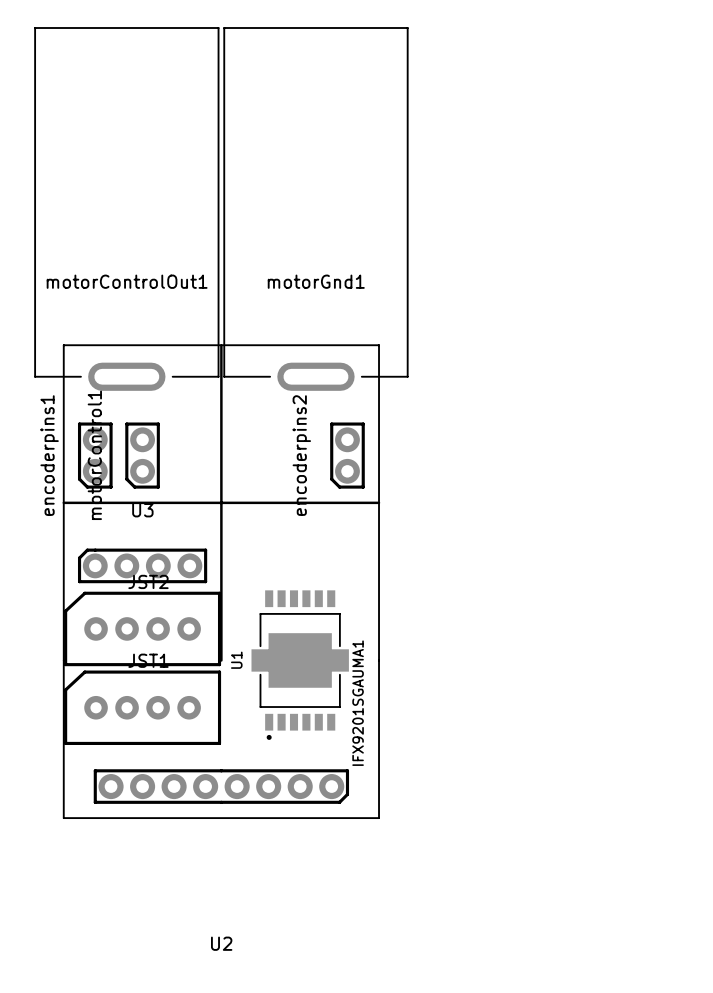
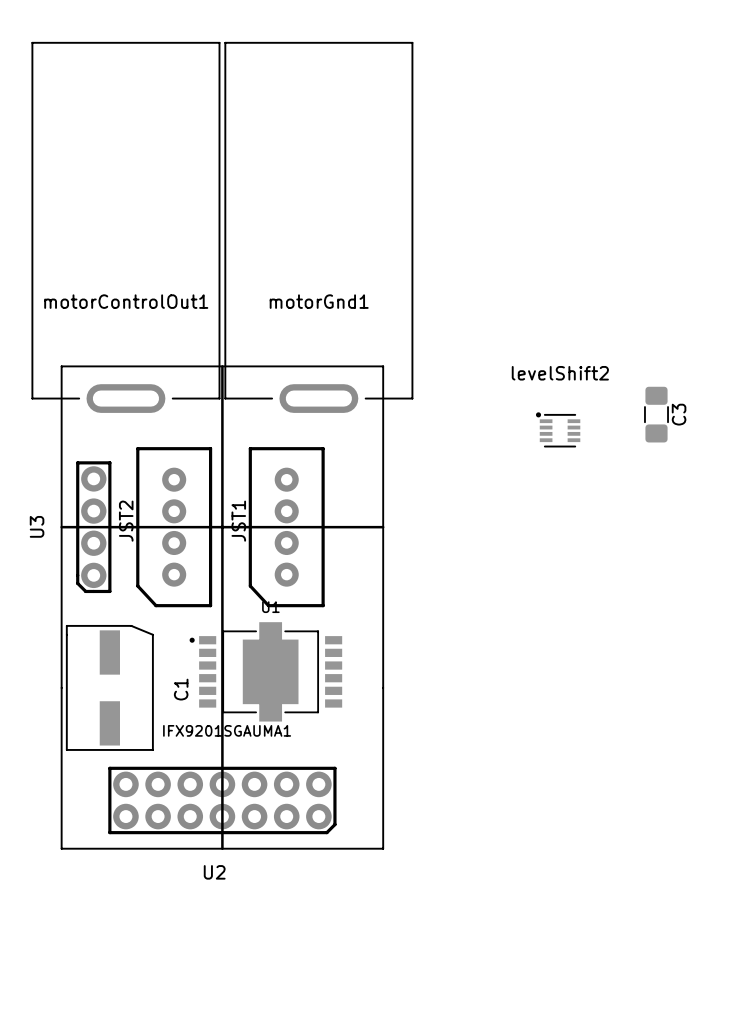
C3: none -> (656, 414)
levelShift2: none -> (558, 429)
encoderpins1: (95, 455) -> none
motorControl1: (142, 455) -> none
encoderpins2: (347, 455) -> none
U3 rotation: 0° (142, 565) -> 90° counterclockwise (93, 527)
U3 position: (142, 565) -> (93, 527)
JST2 rotation: 0° (142, 628) -> 90° counterclockwise (174, 527)
JST2 position: (142, 628) -> (174, 527)
C1: none -> (109, 687)
line: none -> (222, 687) (222, 848)
U1 rotation: 0° (300, 665) -> 90° clockwise (265, 671)
JST1 rotation: 0° (142, 707) -> 90° counterclockwise (286, 527)
JST1 position: (142, 707) -> (286, 527)
U2 footprint: [93, 769, 350, 804] -> [108, 766, 337, 835]
U2 name position: U2 (221, 943) -> U2 (214, 872)

